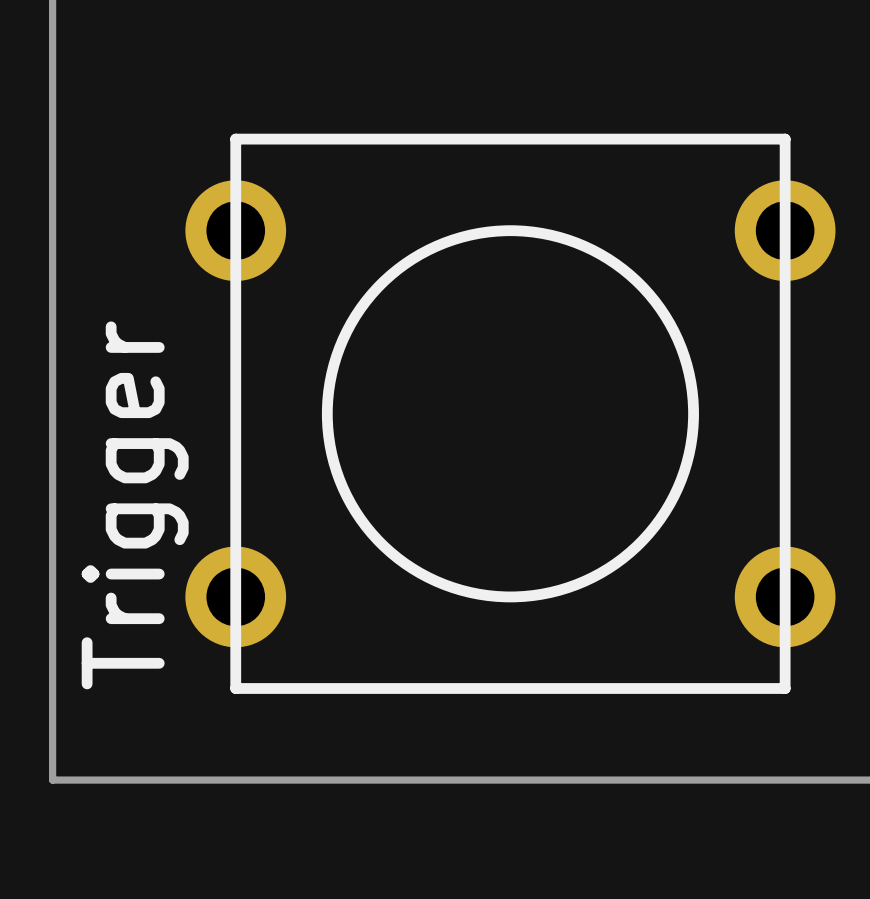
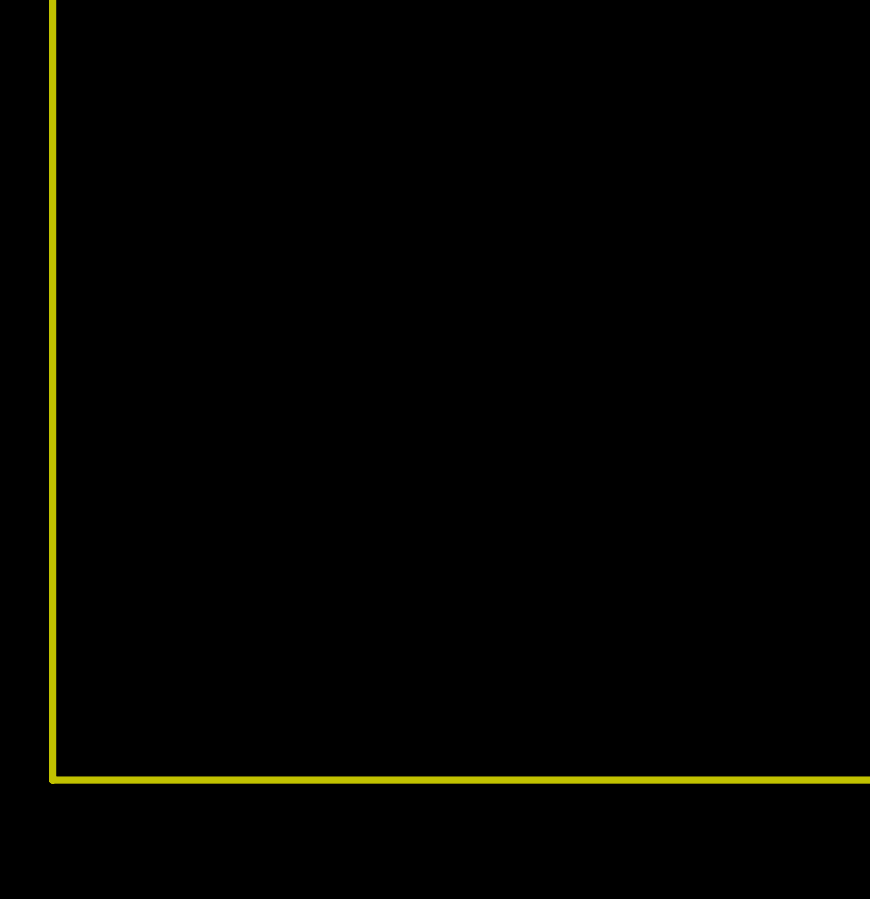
part: Trigger (510, 413) -> none

